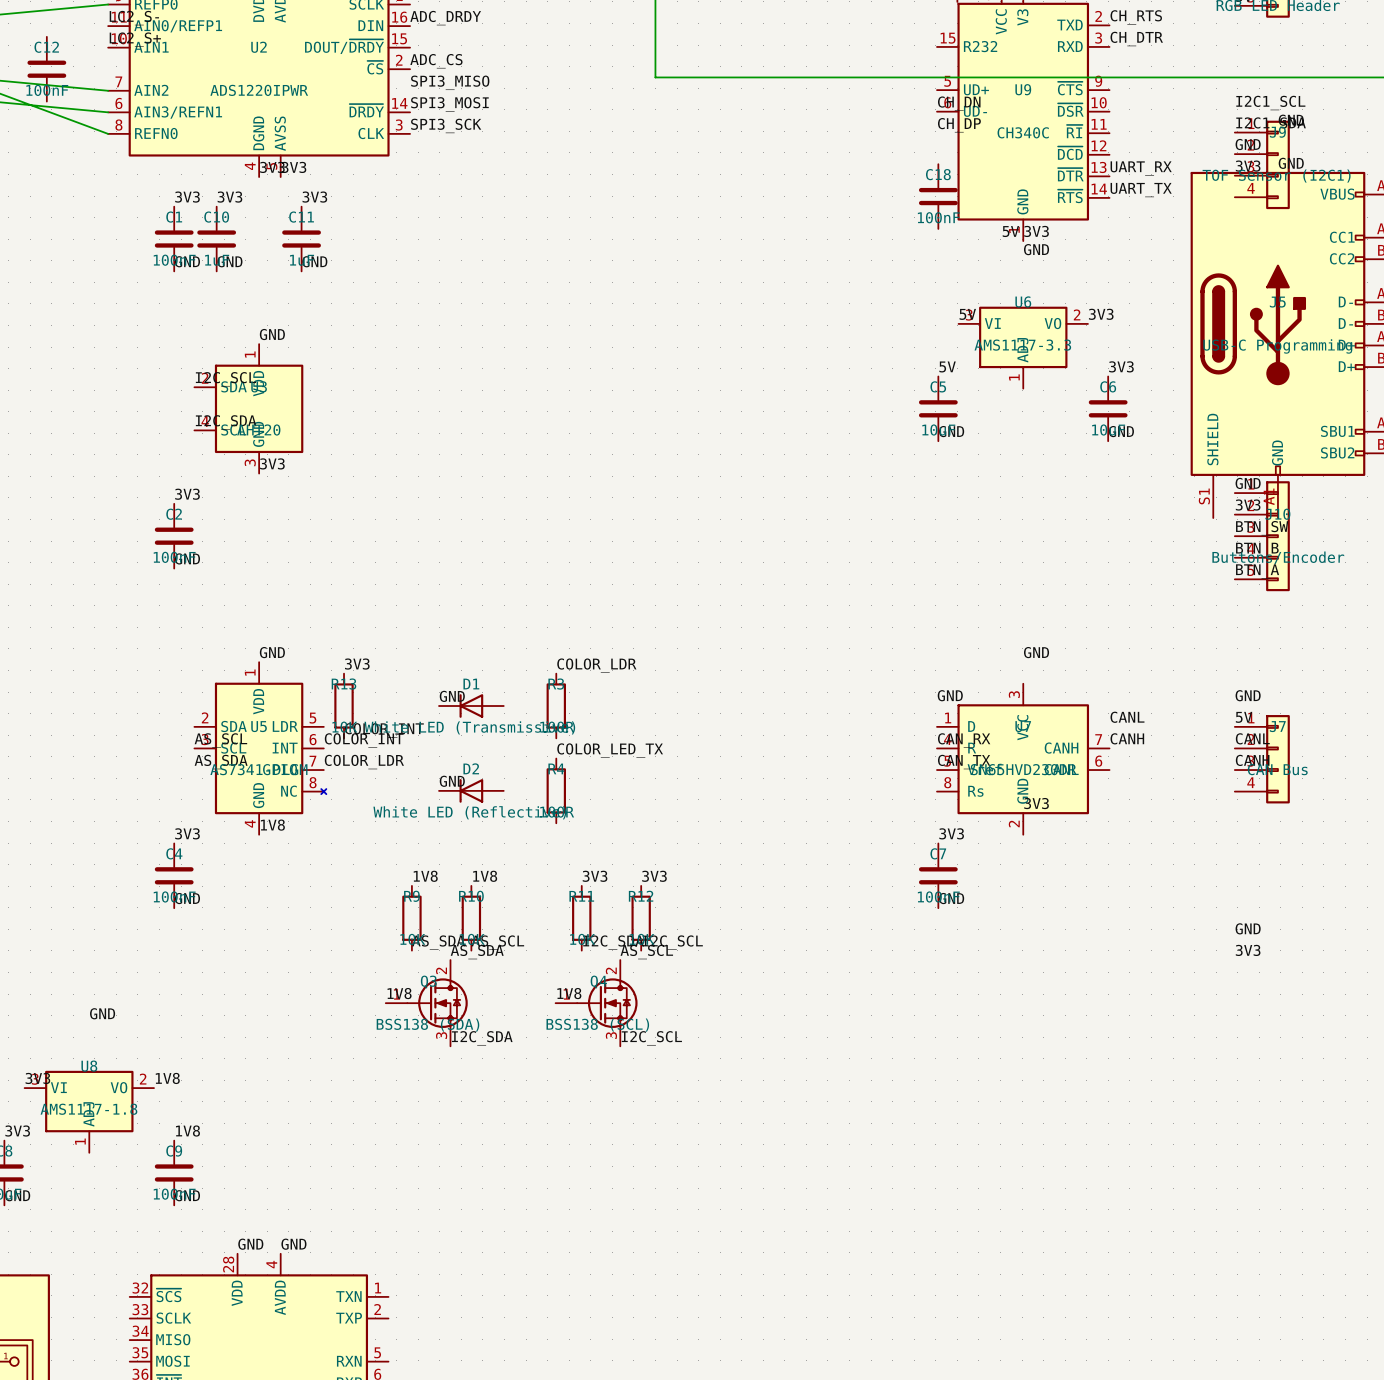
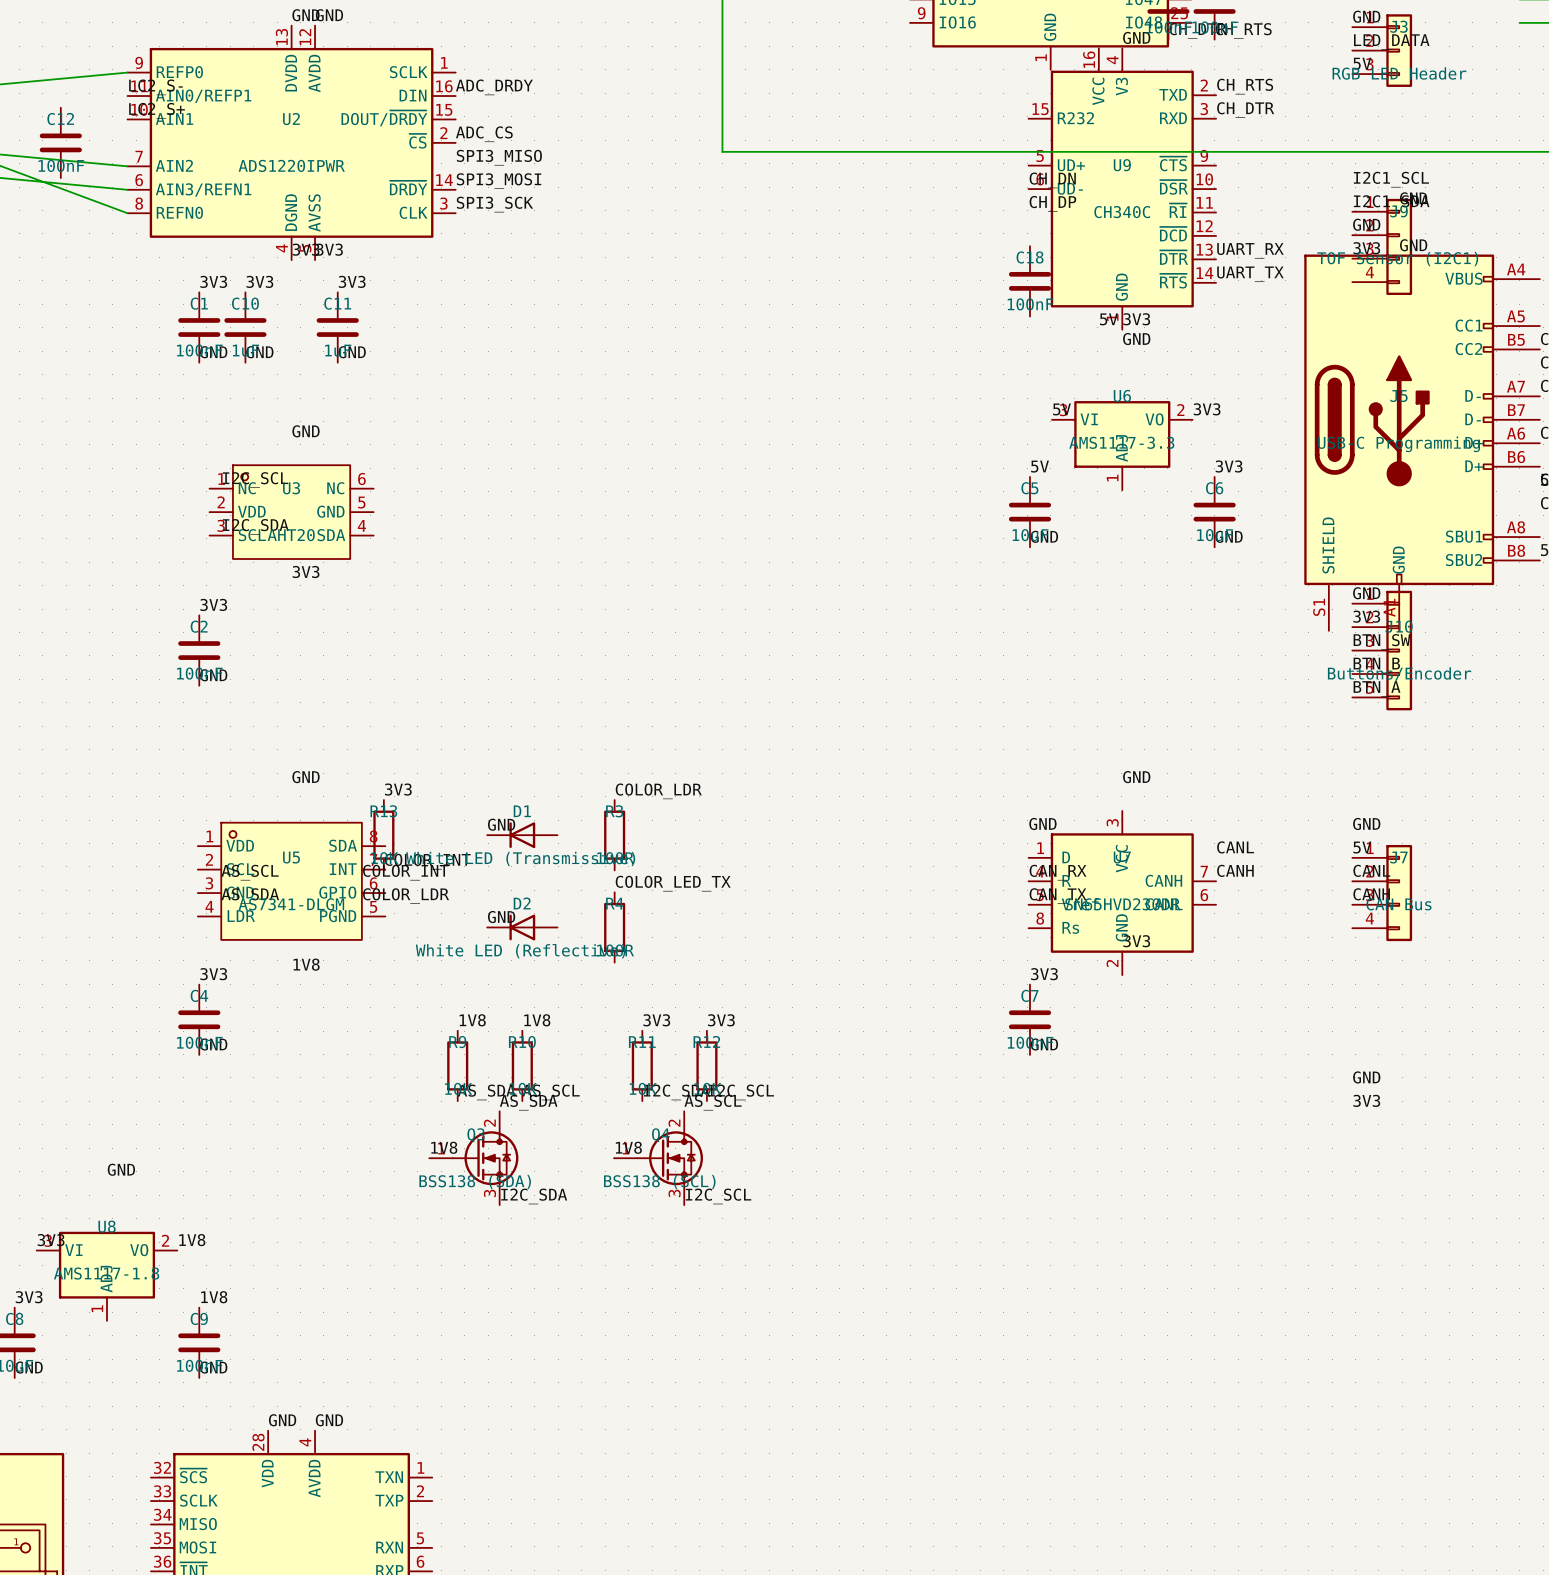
U3 symbol: [194, 344, 304, 474] -> [209, 465, 374, 560]
U5 symbol: [194, 662, 327, 835] -> [197, 822, 386, 940]

